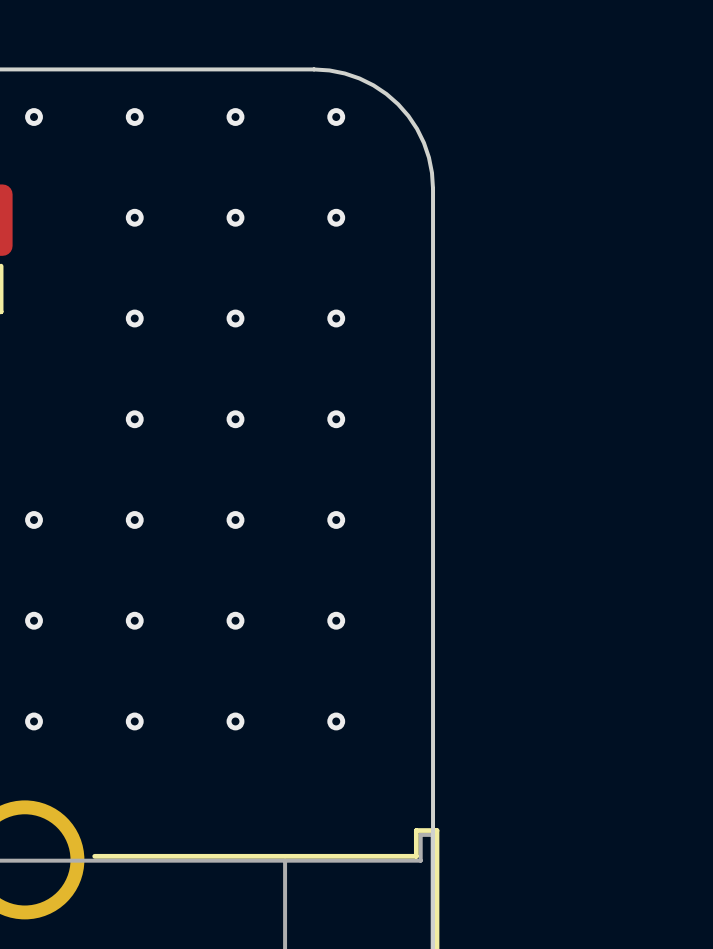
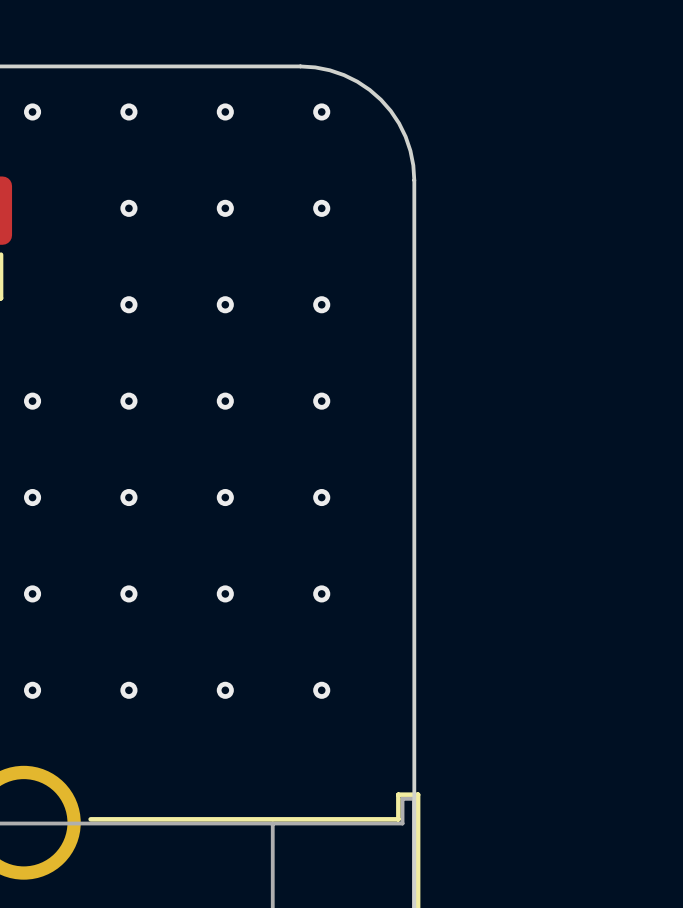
via: none -> (32, 401)

